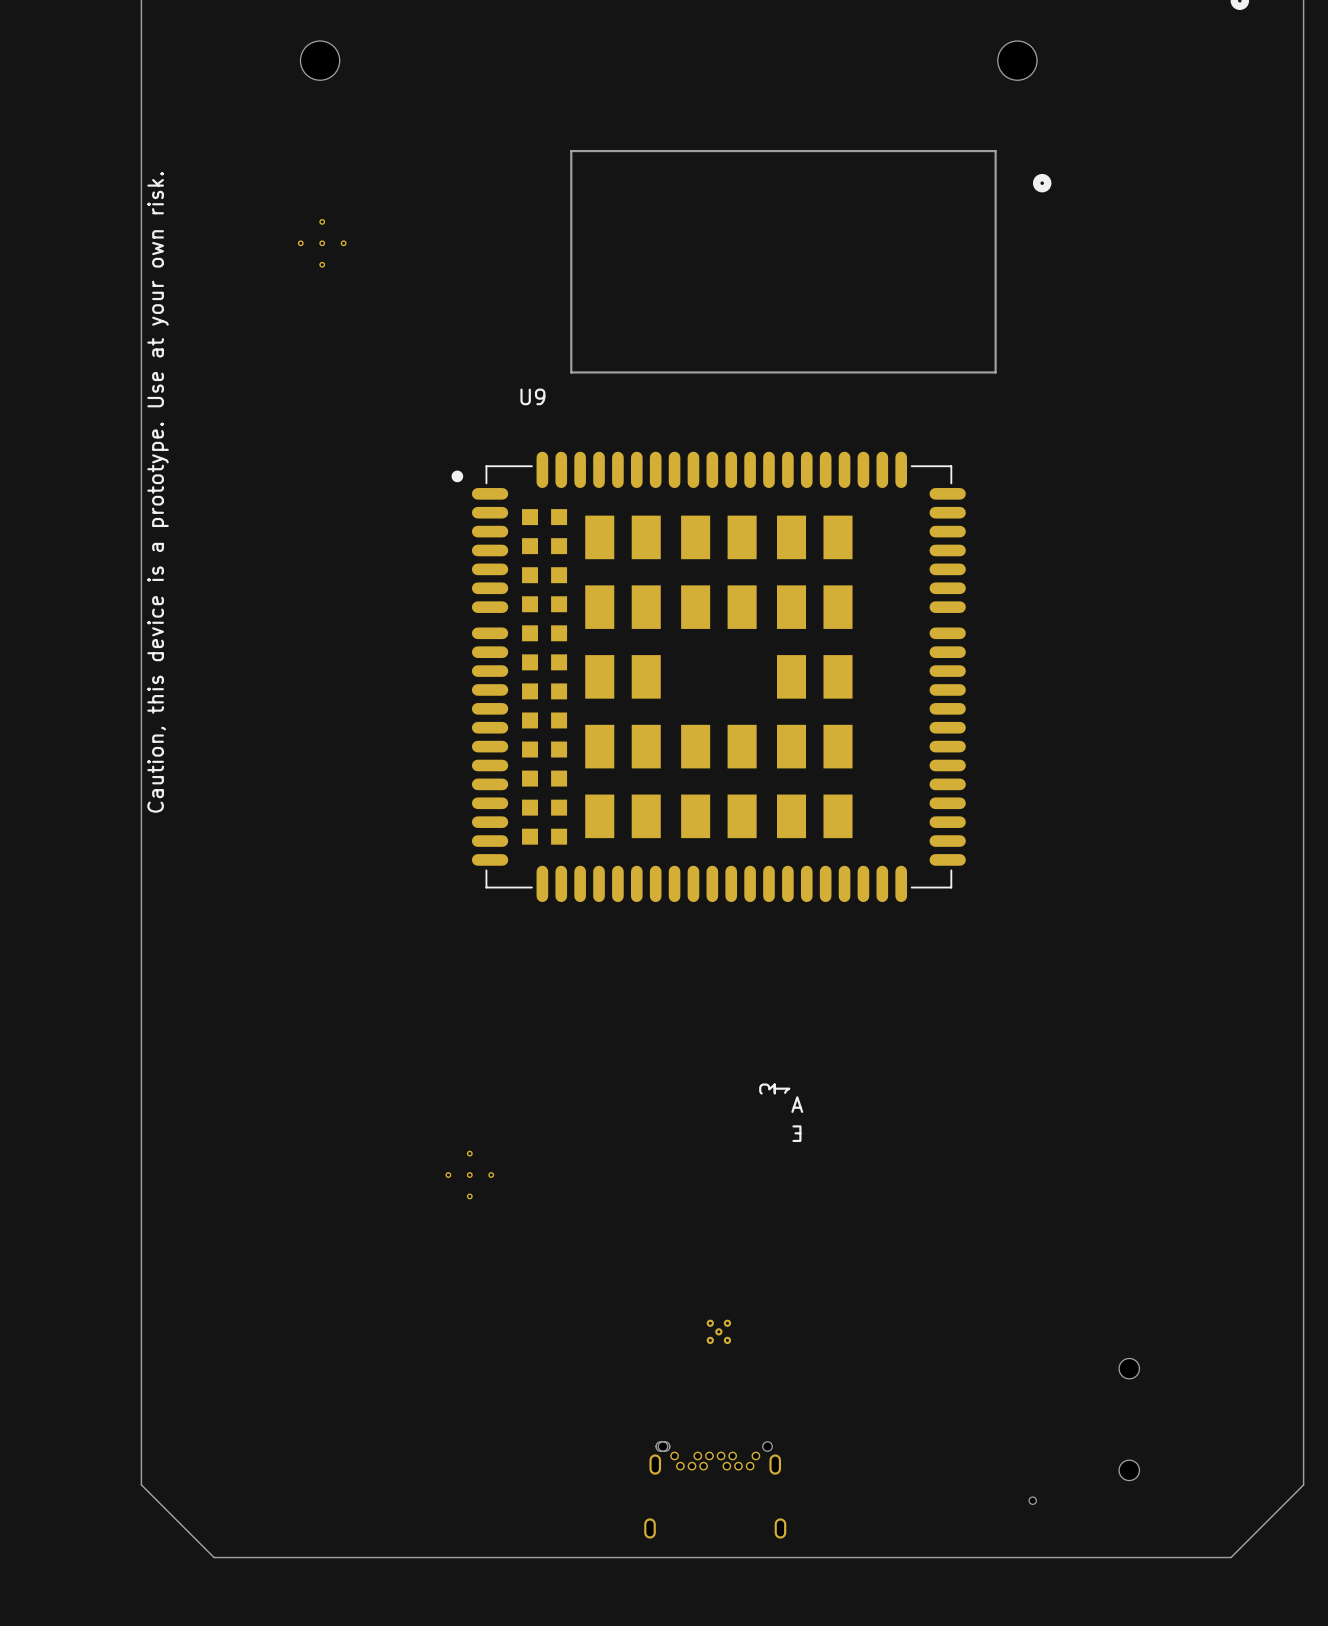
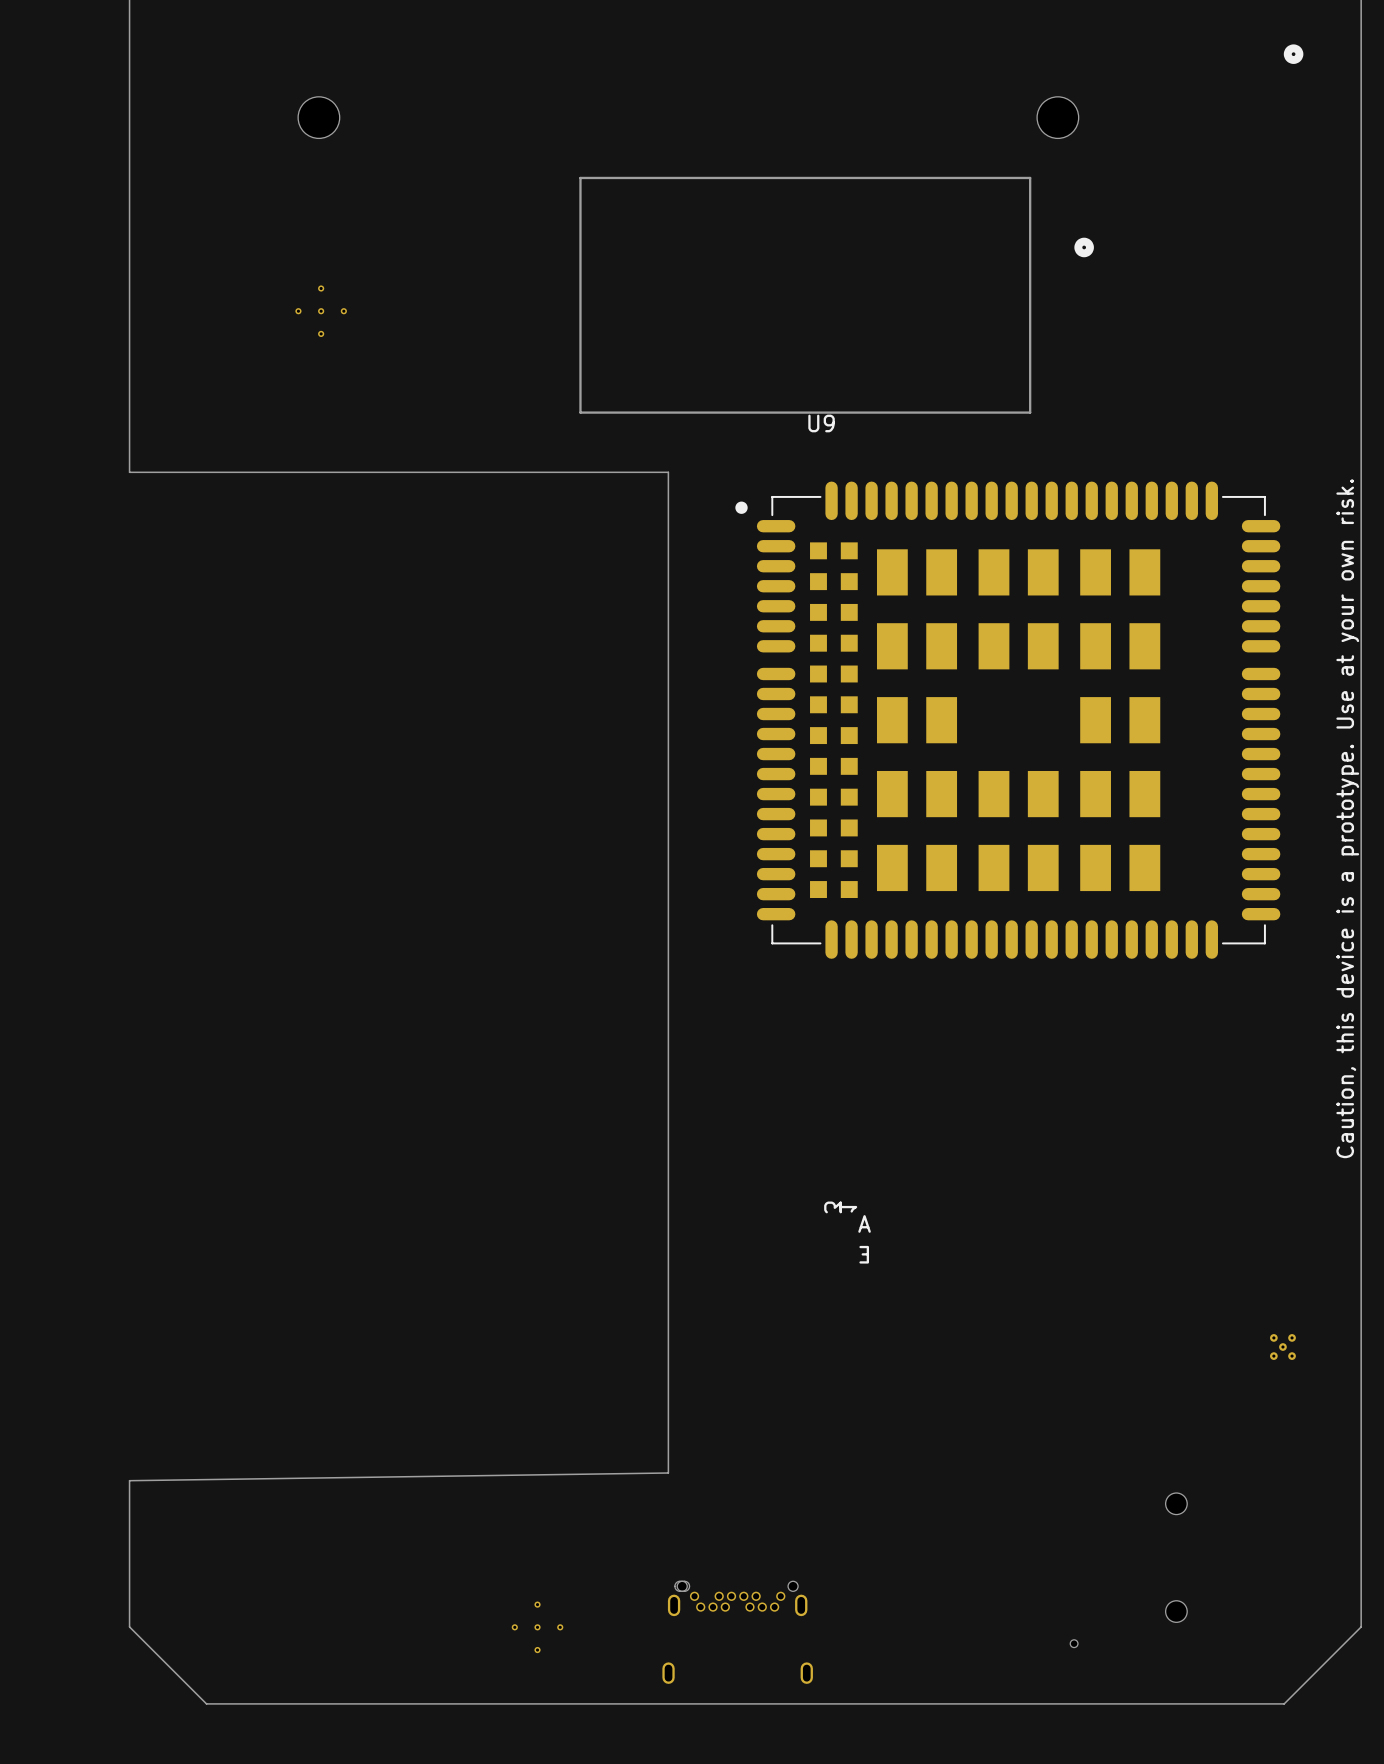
board edge: (995, 151) (571, 151) (571, 372) (995, 372) (995, 151) -> (1030, 177) (1030, 412) (580, 412) (580, 177) (1030, 177)
board edge: (141, 395) (141, 1346) -> (129, 472) (668, 472) (668, 1473) (129, 1480)
text: Caution, this device is a prototype. Use at your own risk. (158, 492) -> none
U9 position: (708, 676) -> (1007, 720)
text: none -> Caution, this device is a prototype. Use at your own risk. (1347, 818)
part position: (781, 1112) -> (847, 1232)
part position: (469, 1175) -> (537, 1627)
part: none -> (1282, 1347)
part: (718, 1331) -> none

